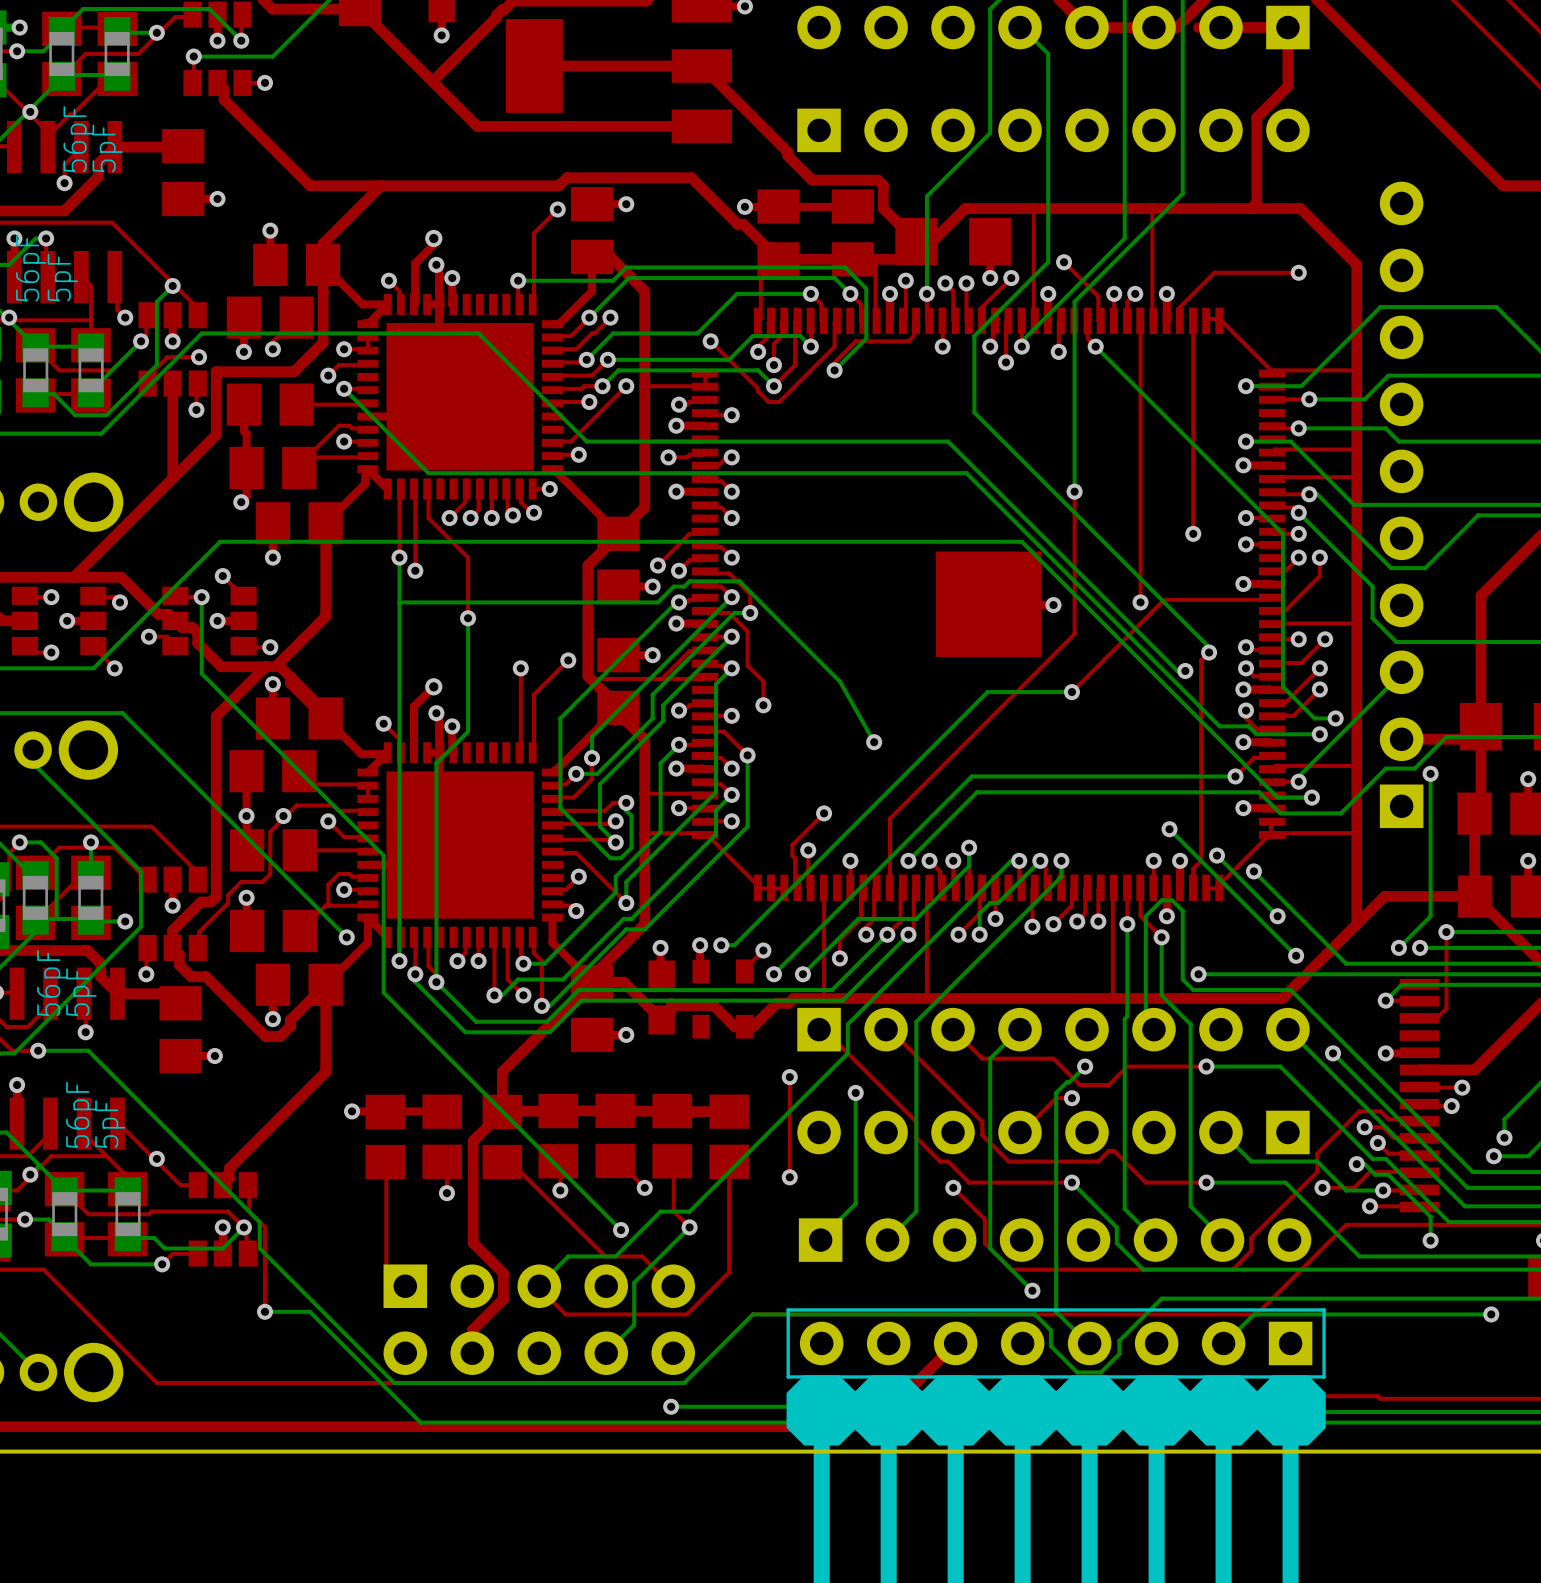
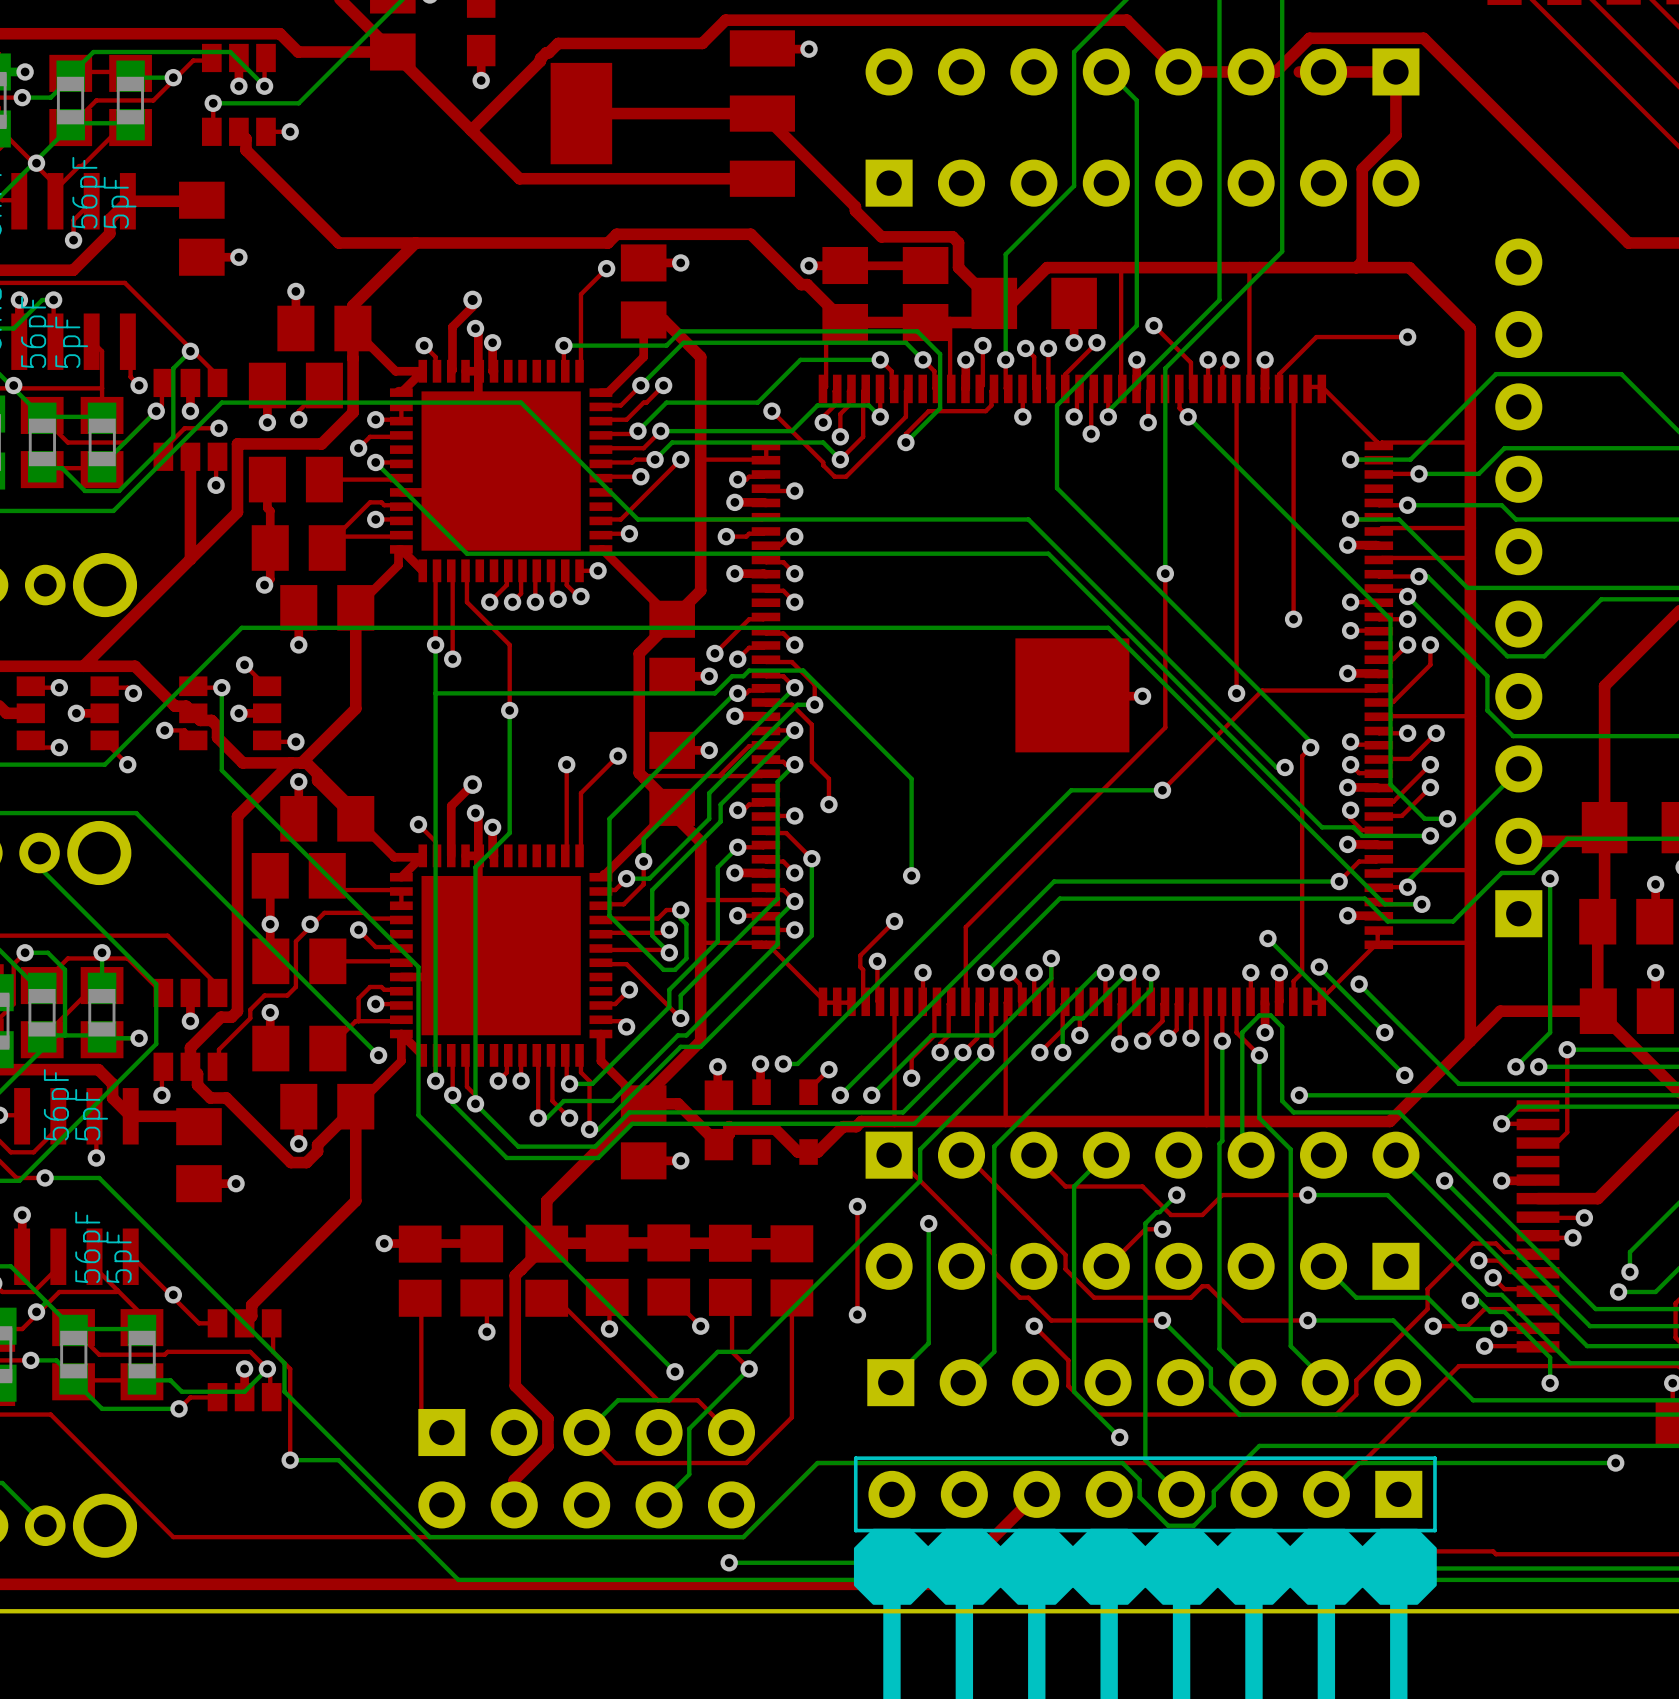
bottom track: (839, 681) (874, 742) -> (911, 778) (911, 875)
via position: (874, 742) -> (911, 875)

